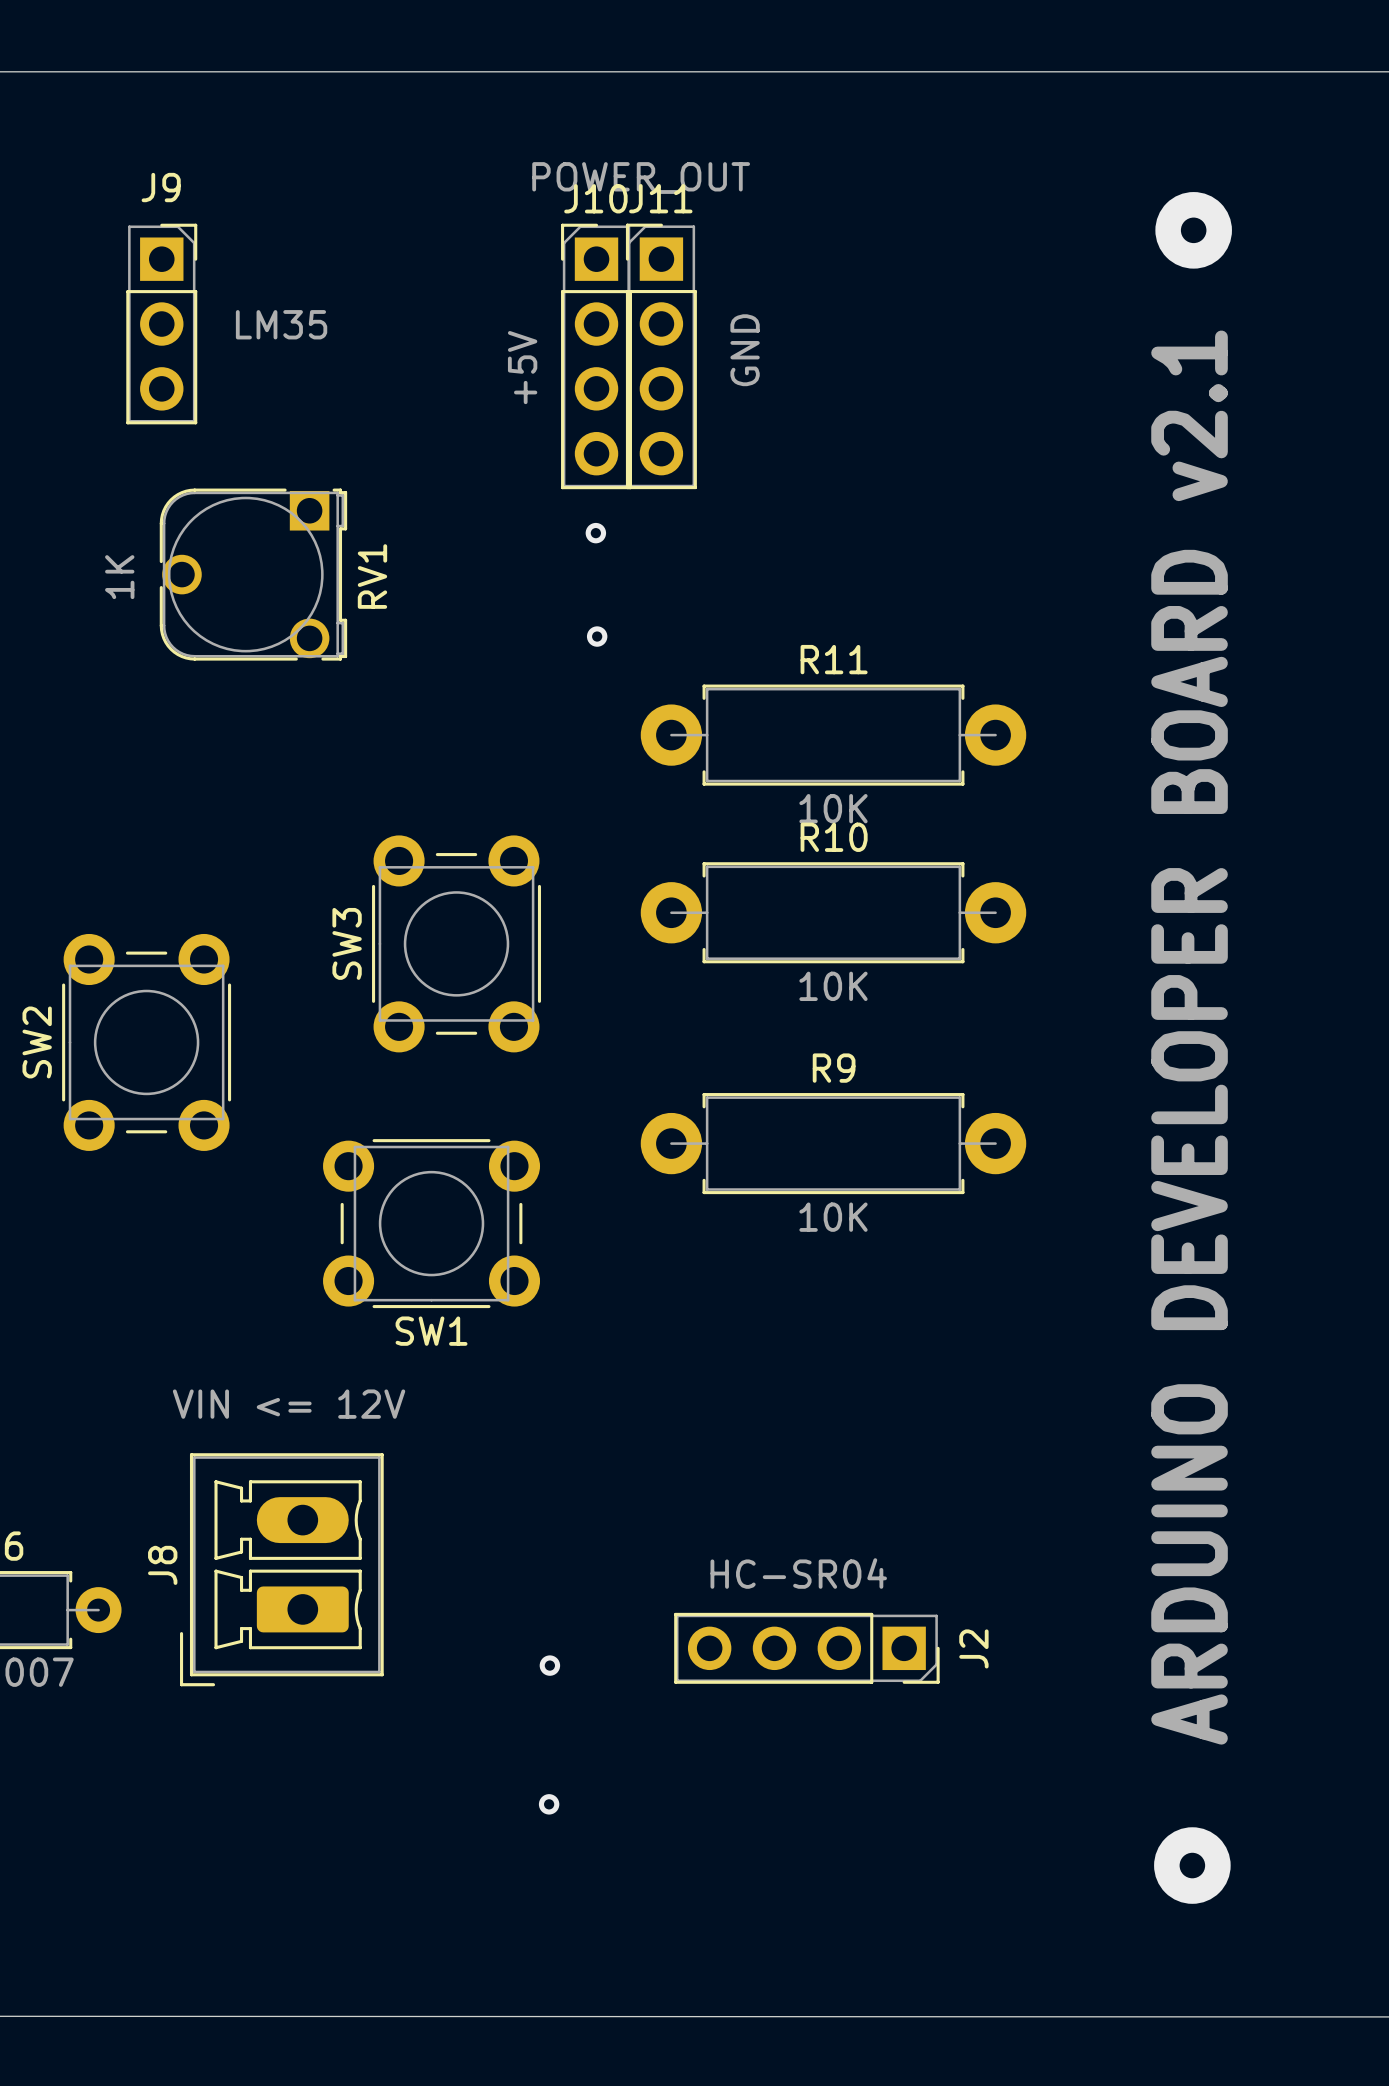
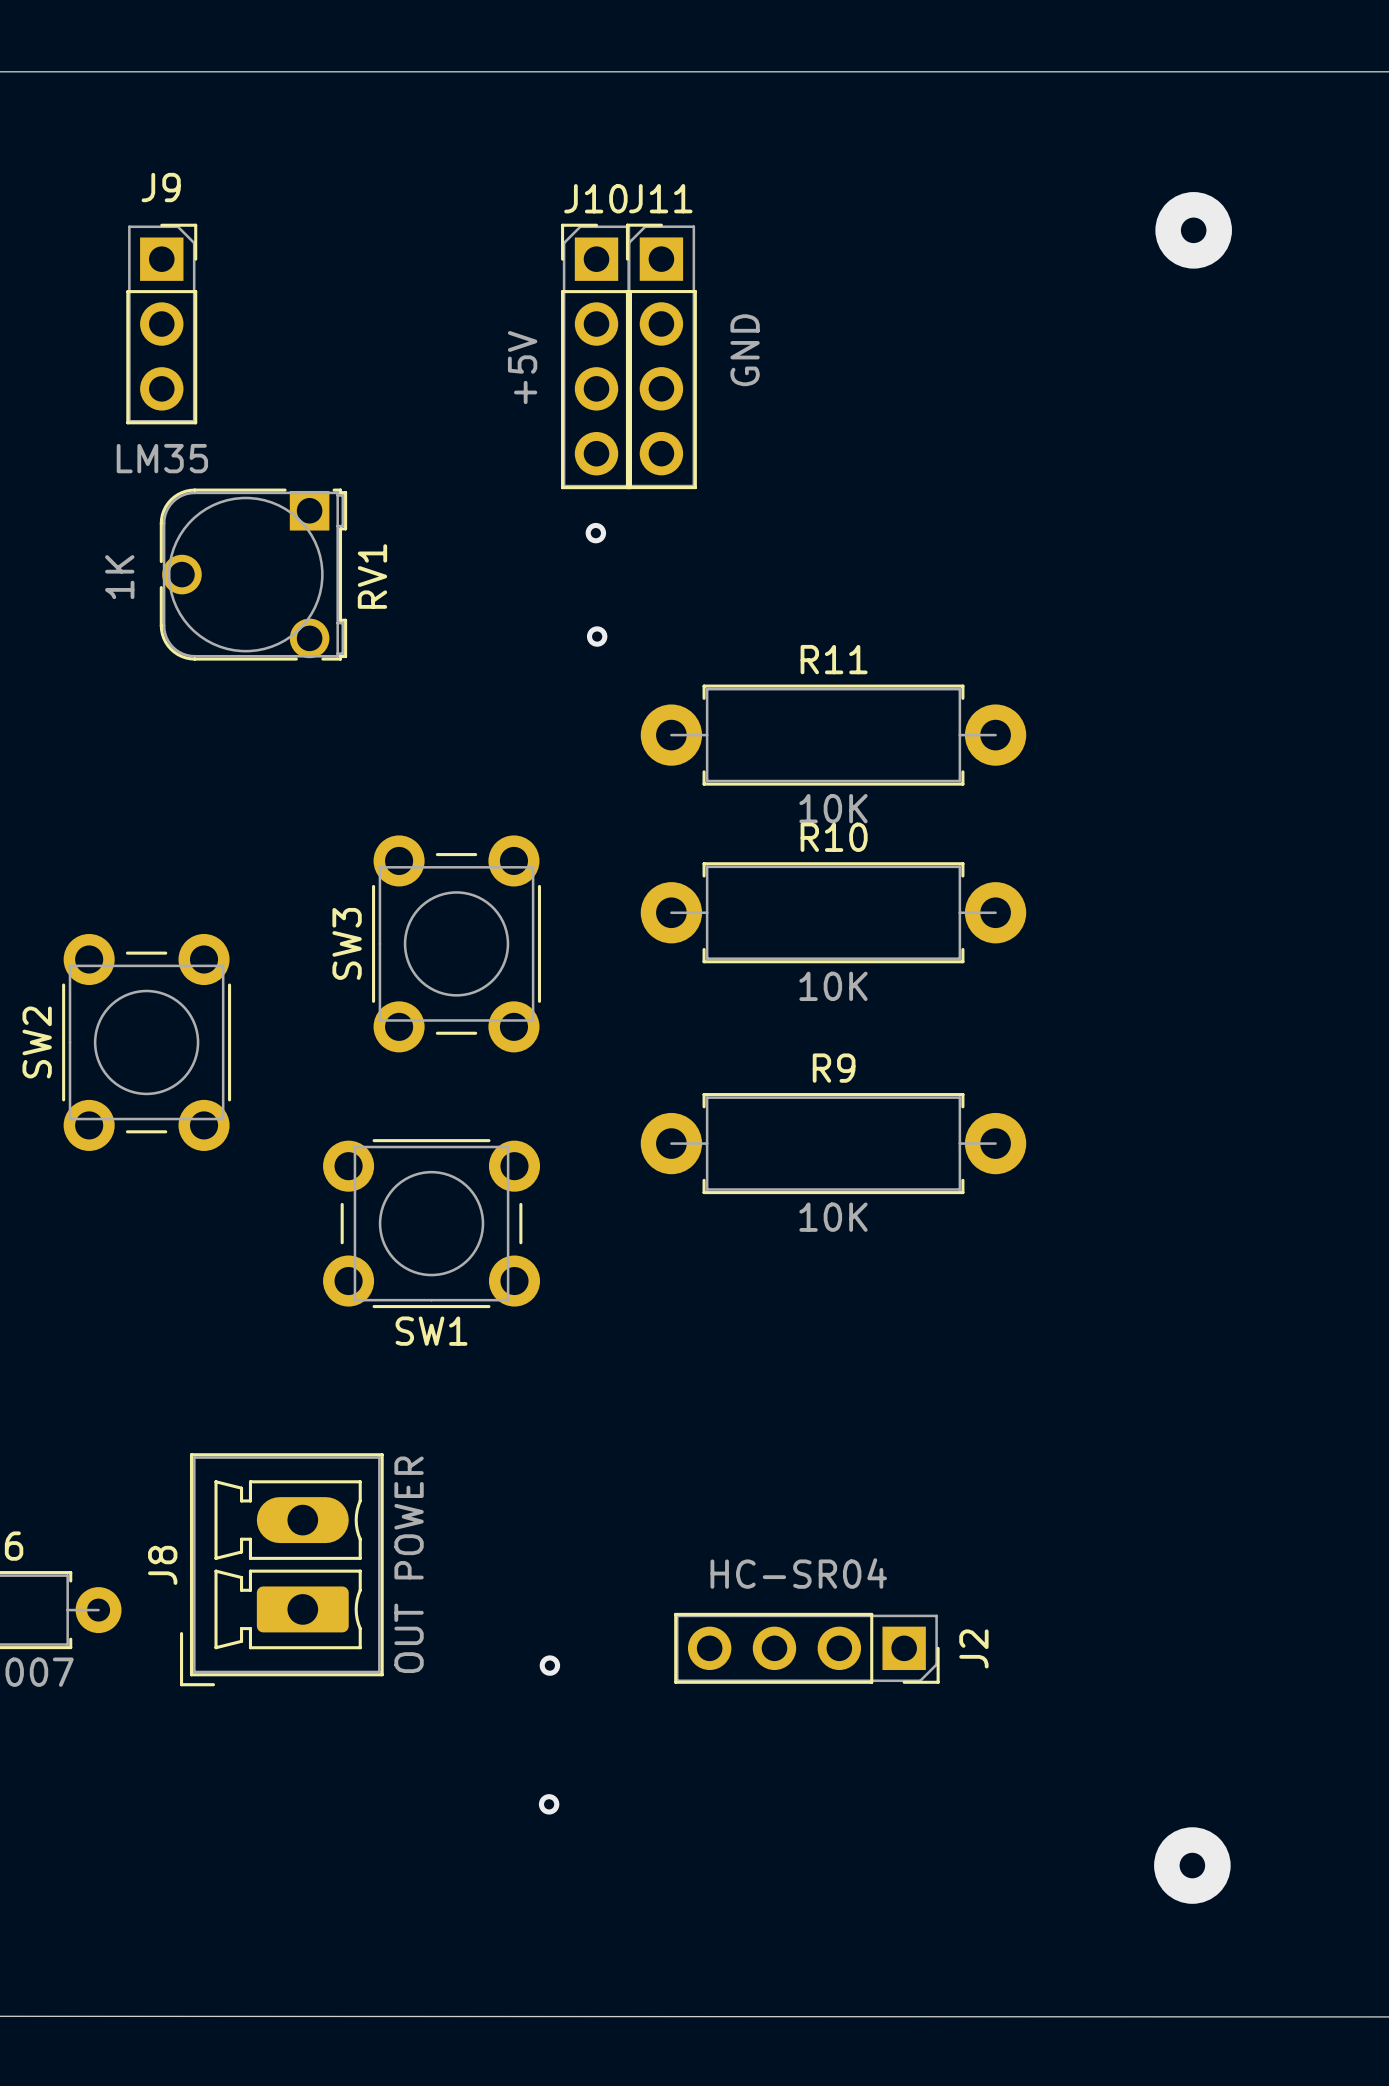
text: POWER_OUT (641, 178) -> none
J9 value position: LM35 (281, 324) -> LM35 (162, 458)
text: ARDUINO DEVELOPER BOARD v2.1 (1189, 1037) -> none
J8 value: VIN <= 12V (289, 1404) -> OUT POWER (409, 1564)

